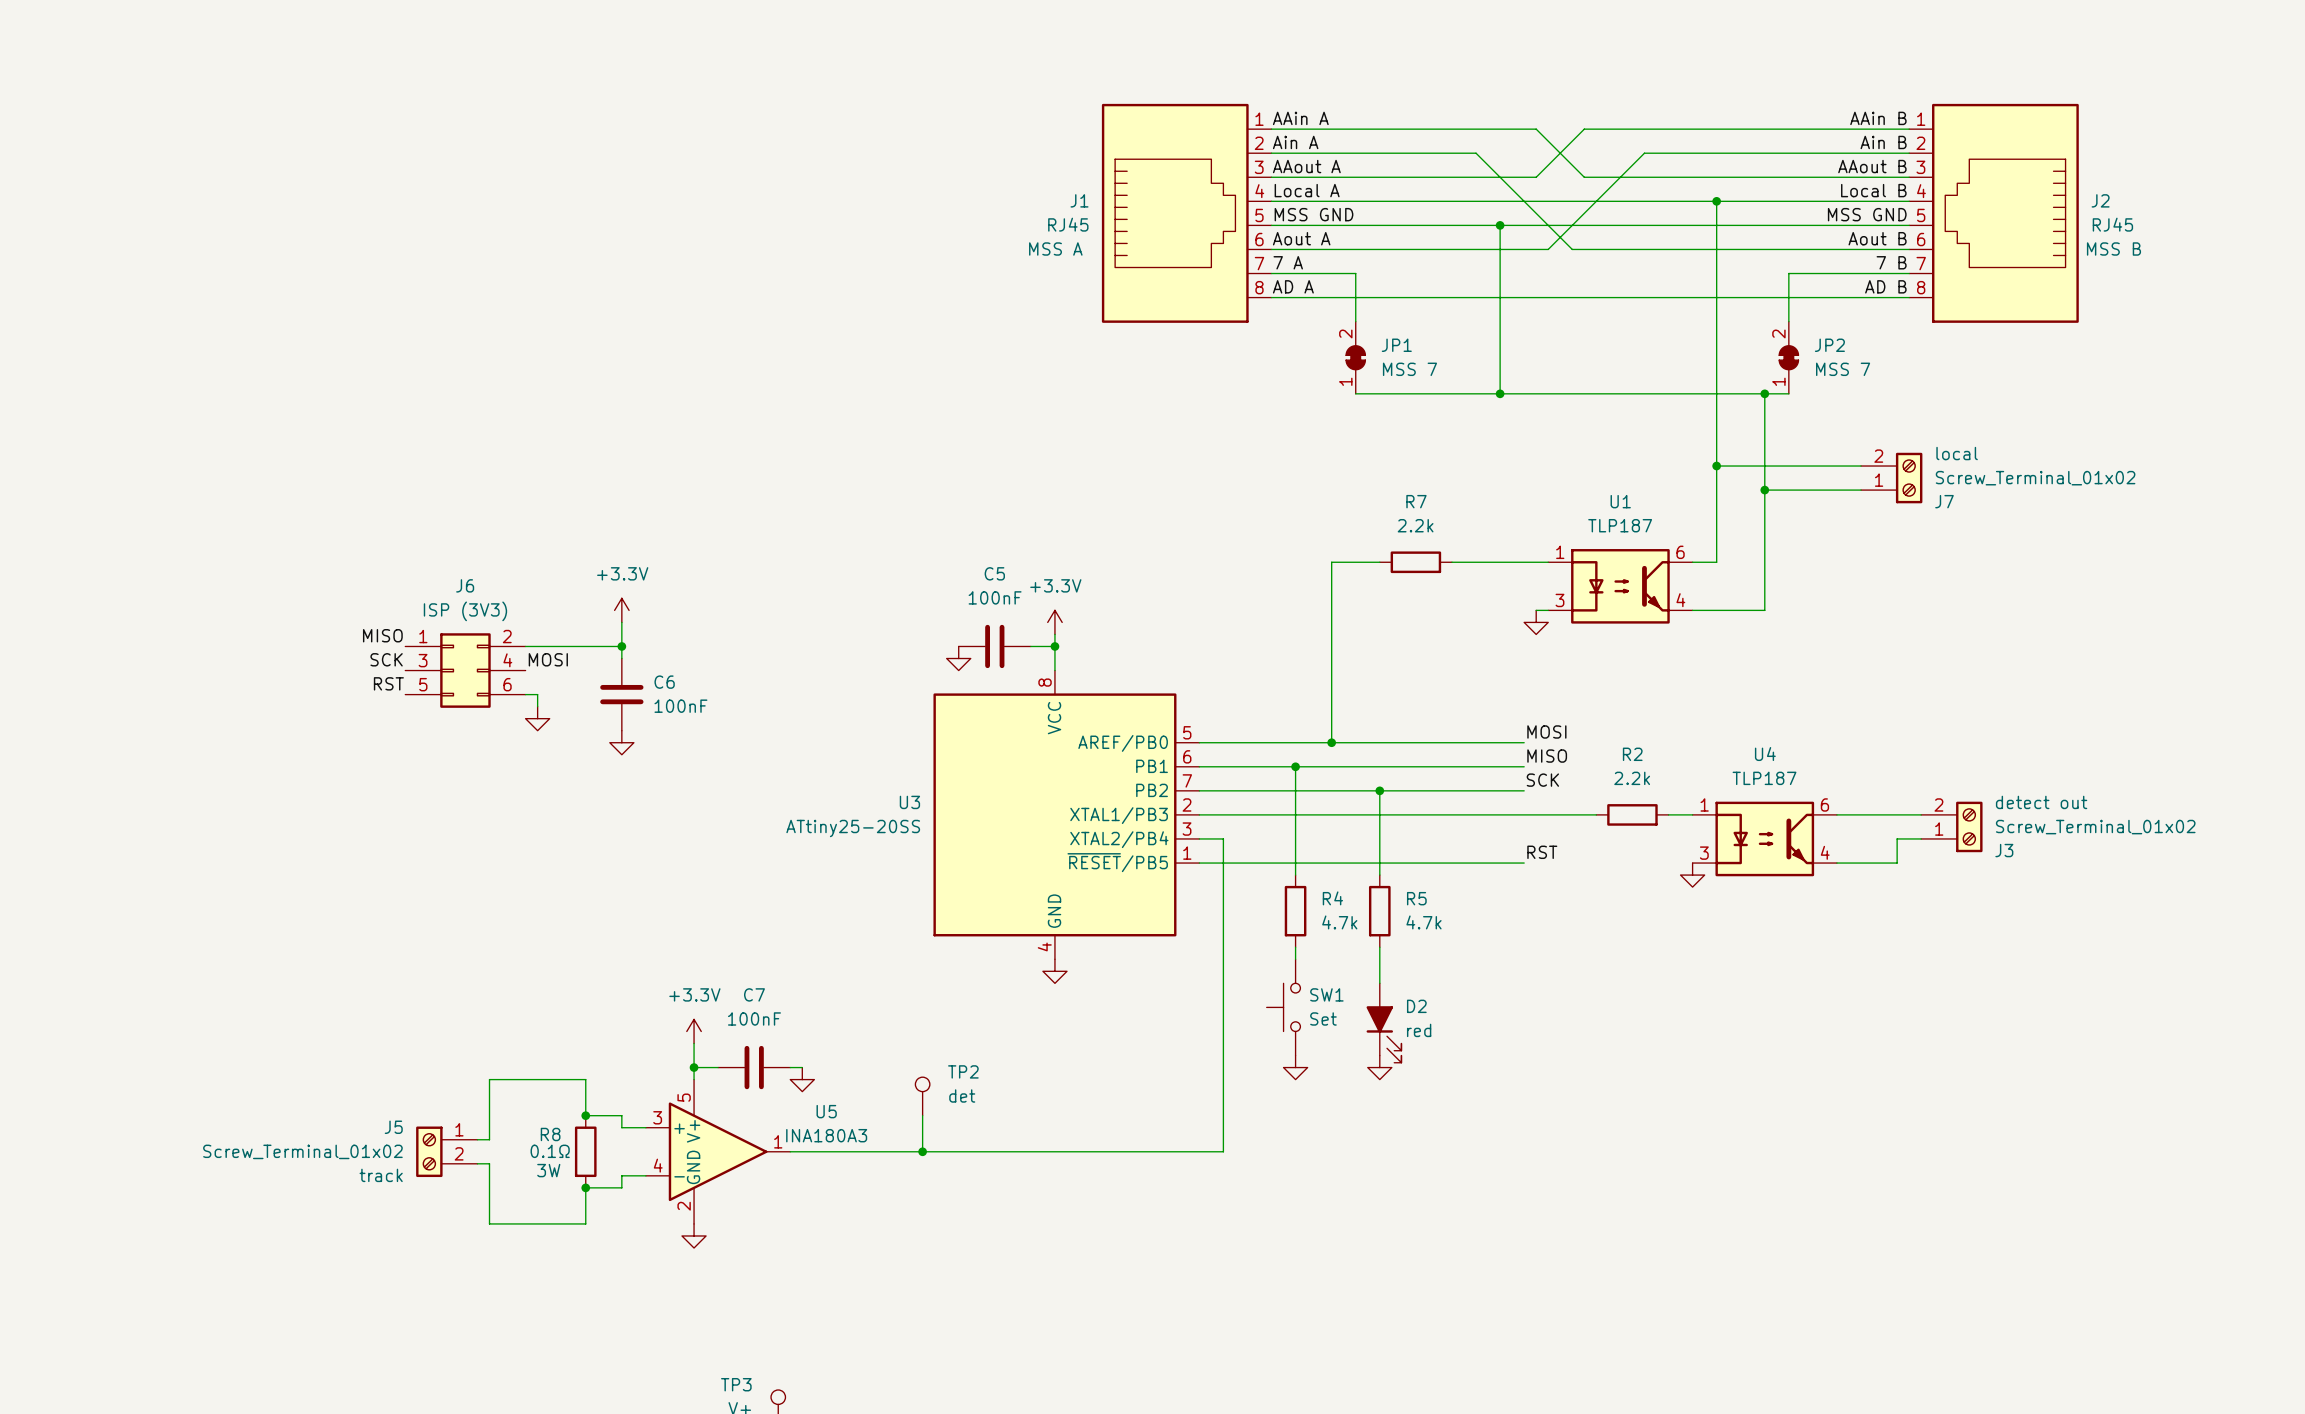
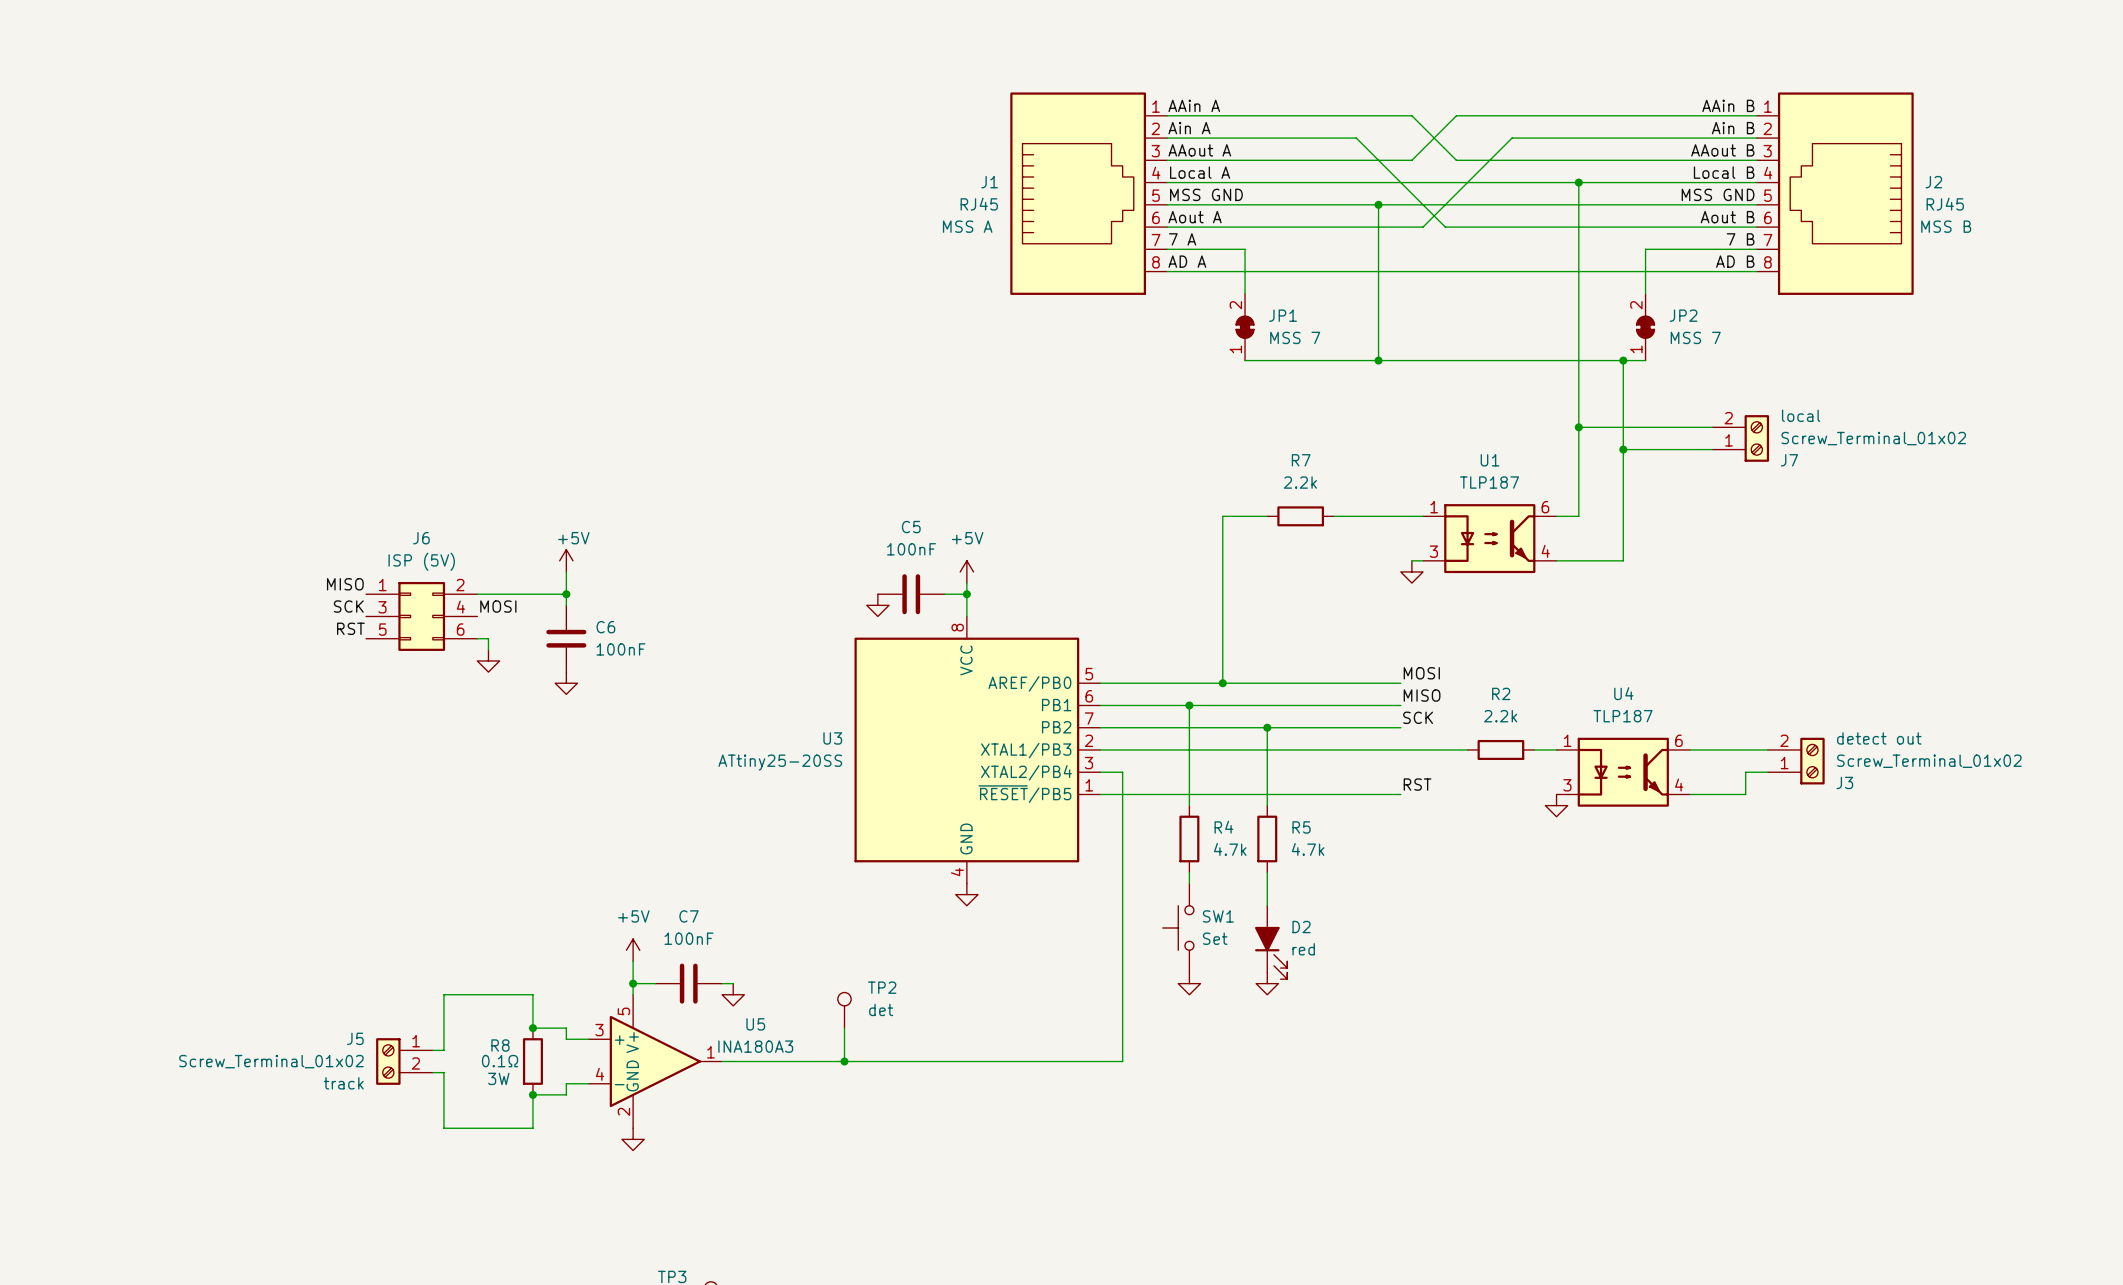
power symbol: +3.3V (621, 610) -> +5V (566, 560)
J6 value: ISP (3V3) (465, 611) -> ISP (5V) (421, 561)
power symbol: +3.3V (1054, 622) -> +5V (966, 571)
power symbol: +3.3V (694, 1031) -> +5V (633, 950)

